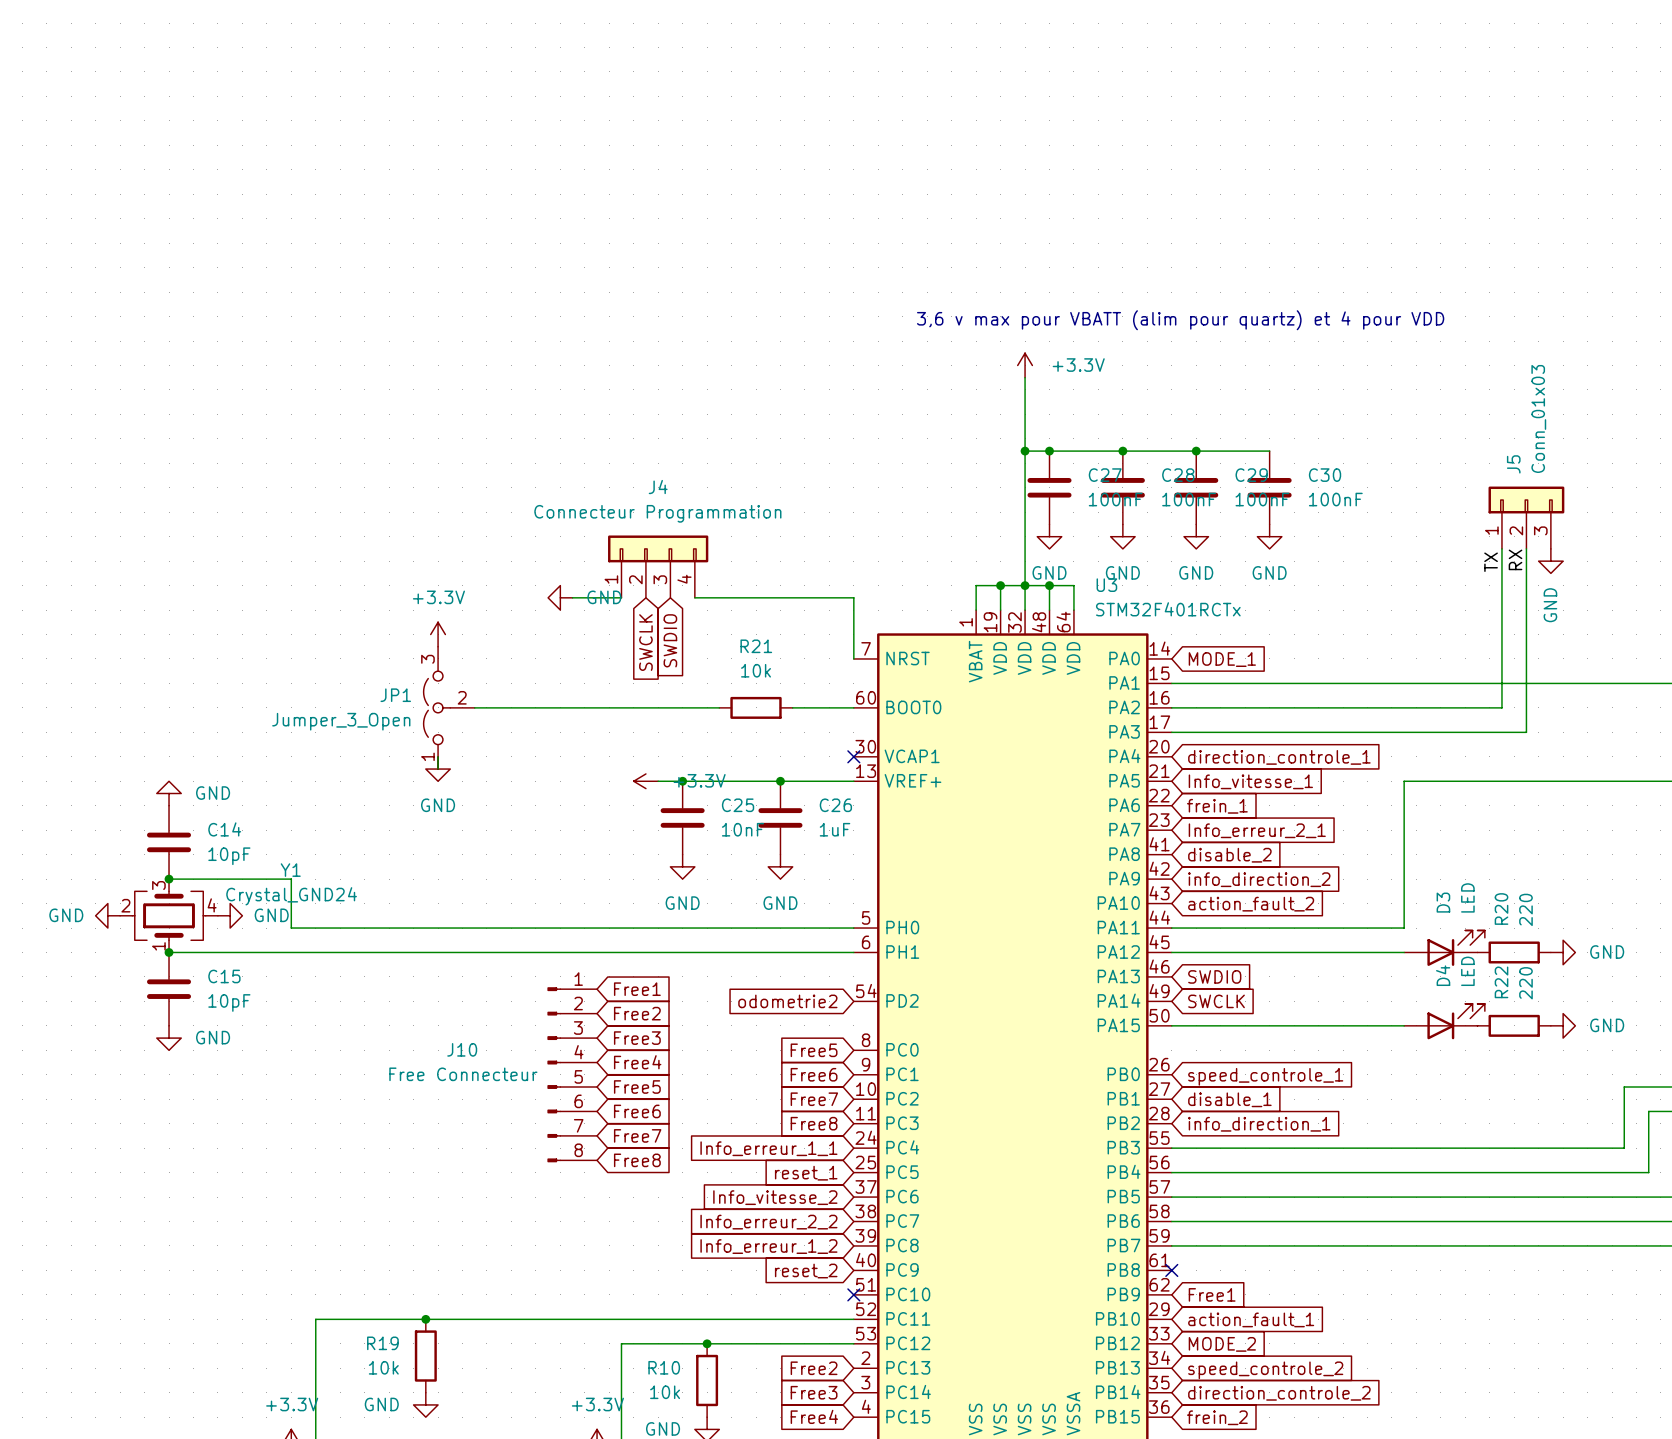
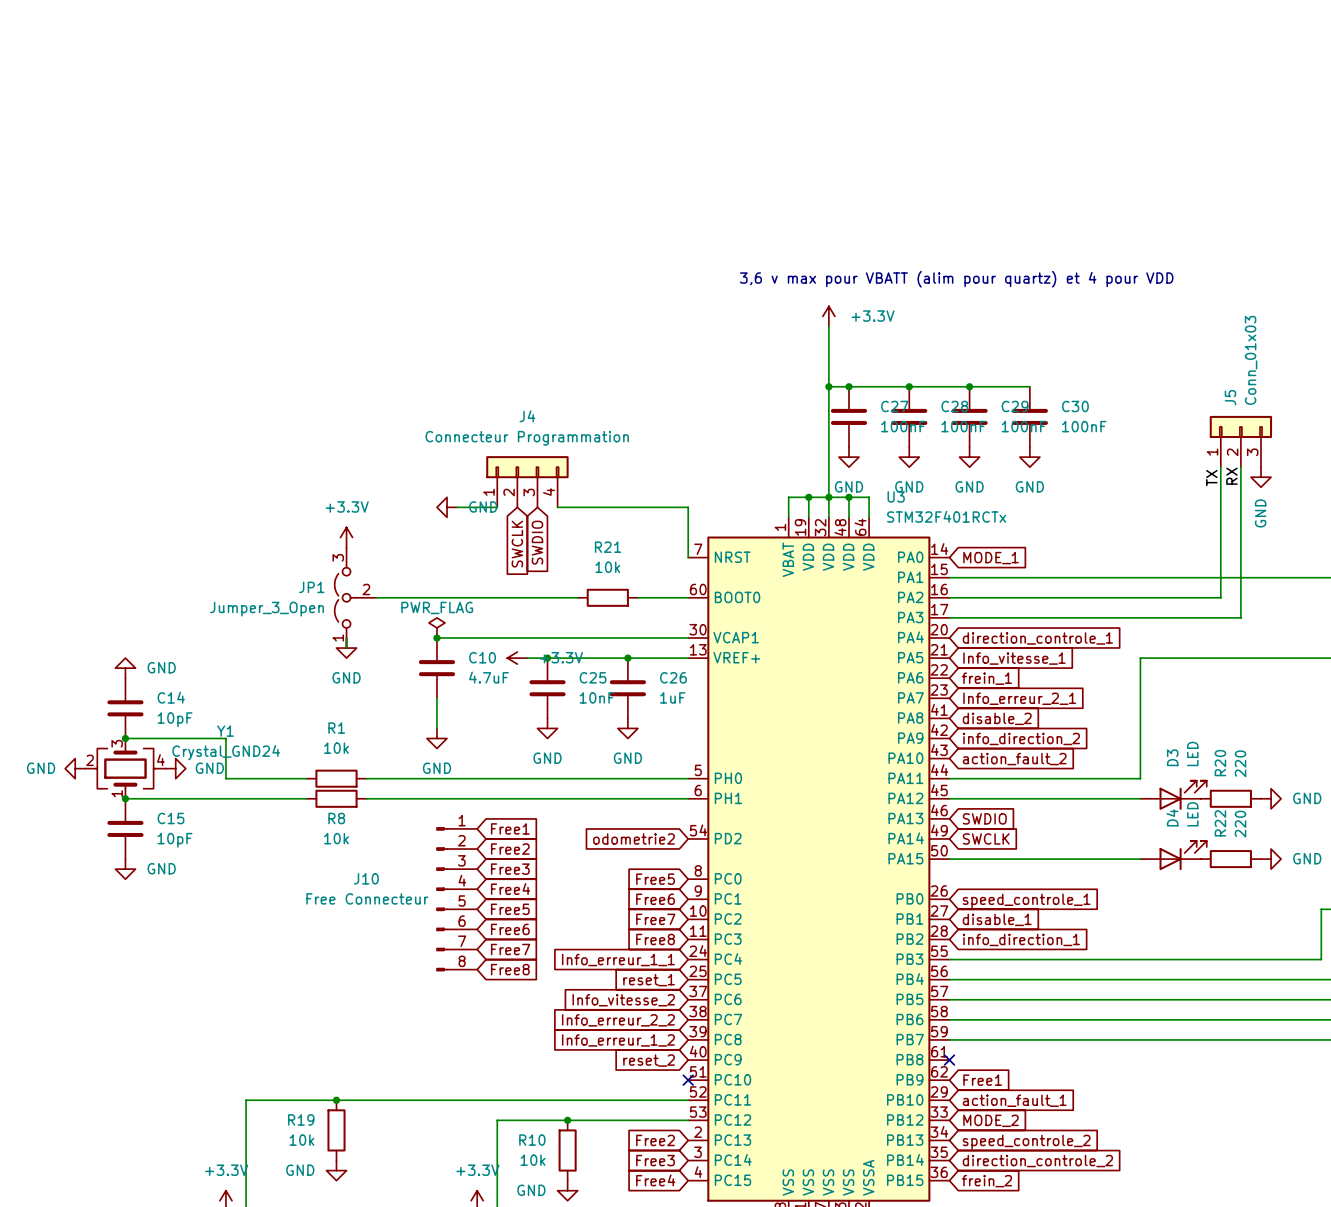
power symbol: none -> PWR_FLAG (436, 627)
wire: none -> (436, 638) (688, 638)
junction: none -> (436, 638)
no-connect mark: (853, 756) -> none
C10: none -> 4.7uF (436, 668)
wire: none -> (436, 698) (436, 728)
power symbol: none -> GND (436, 738)
wire: (389, 928) (462, 928) -> none
R1: none -> 10k (336, 778)
wire: (389, 952) (462, 952) -> none
R8: none -> 10k (336, 798)

